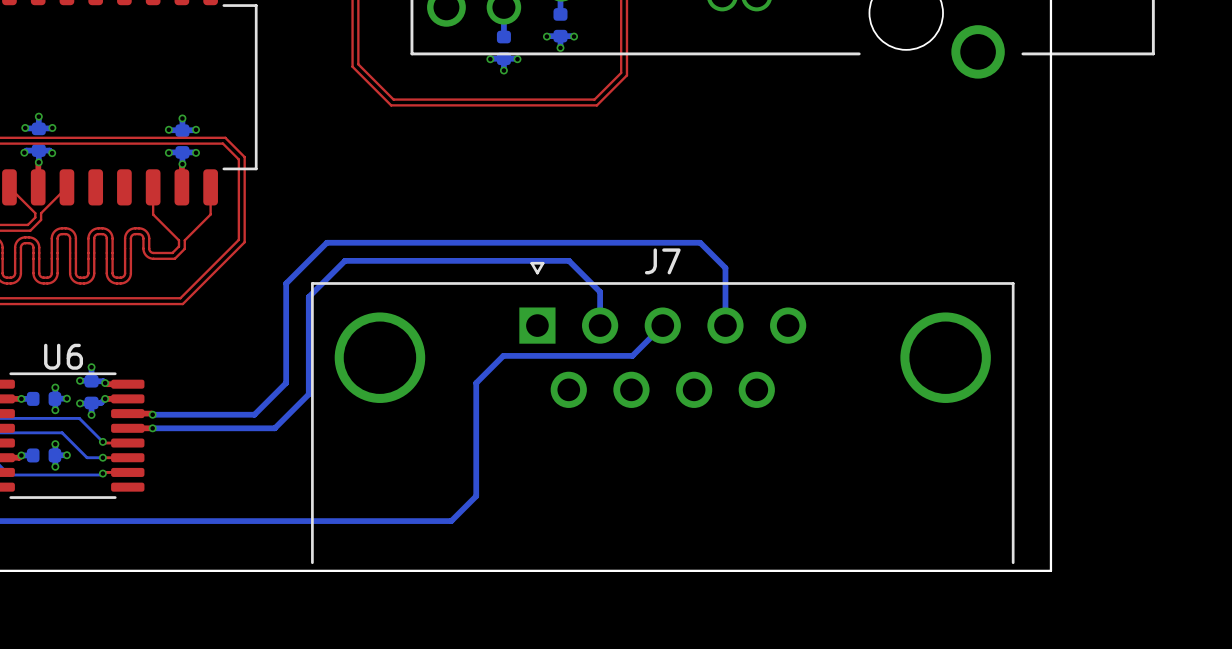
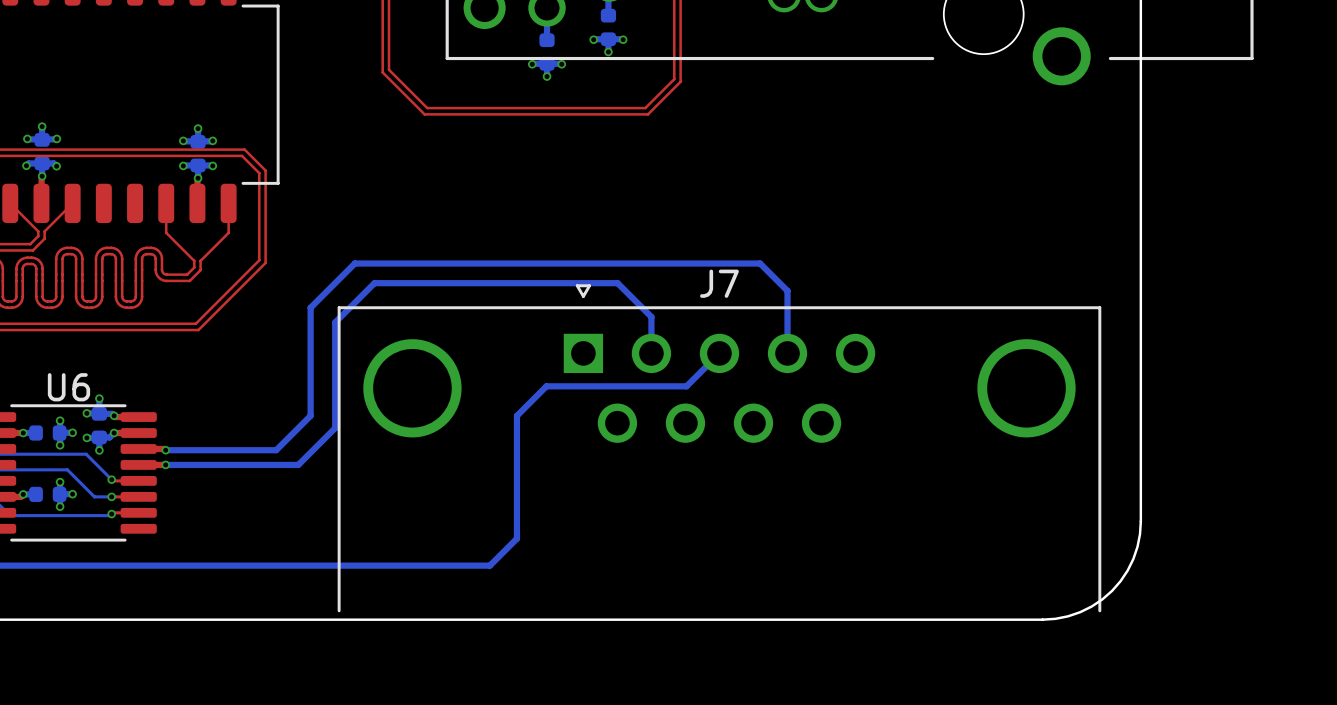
board edge: (1050, 480) (1050, 570) (960, 570) -> (1140, 521) (1137, 546) (1133, 559) (1120, 581) (1112, 590) (1091, 606) (1080, 612) (1068, 616) (1042, 619)

